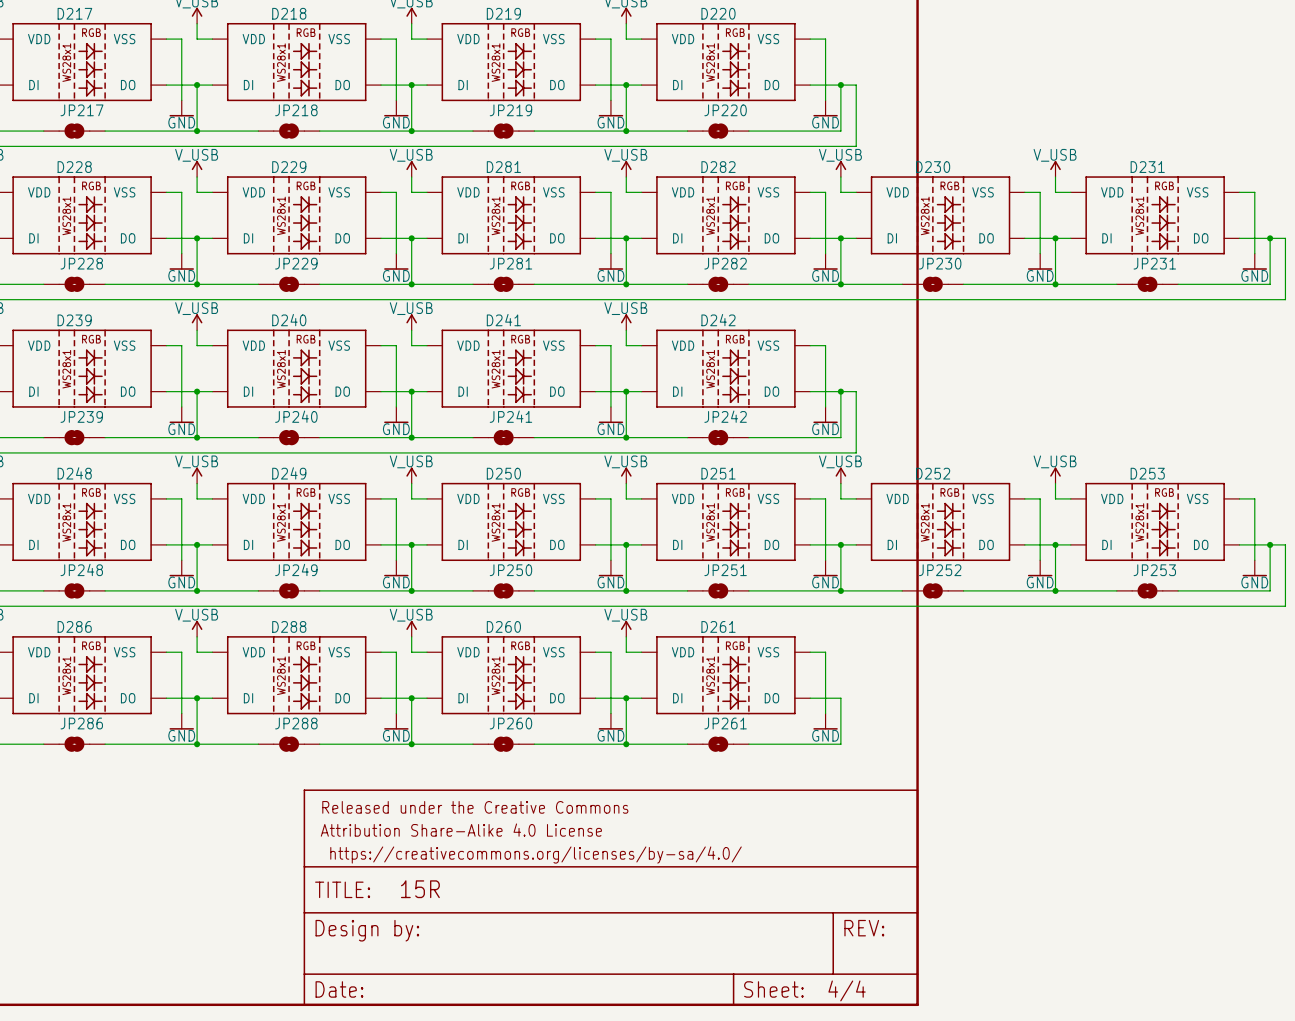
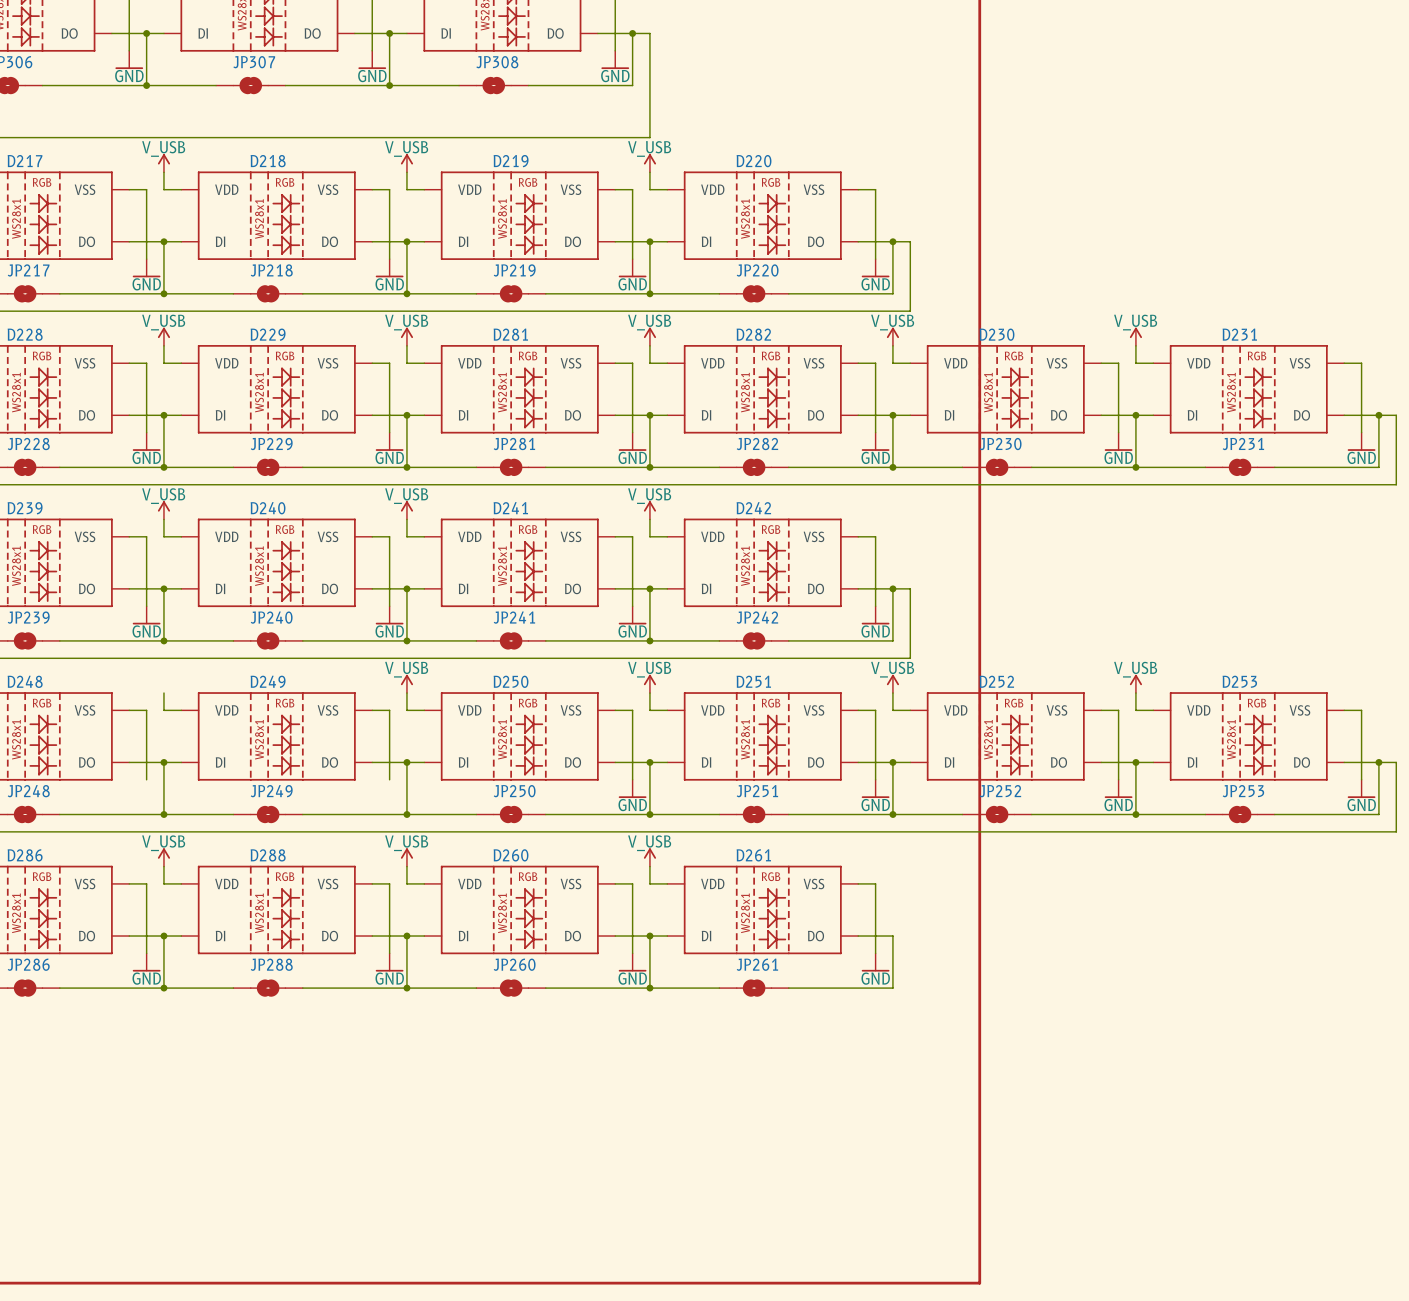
power symbol: V_USB (197, 475) -> none
power symbol: GND (181, 568) -> none
power symbol: GND (396, 568) -> none
part: (610, 897) -> none

